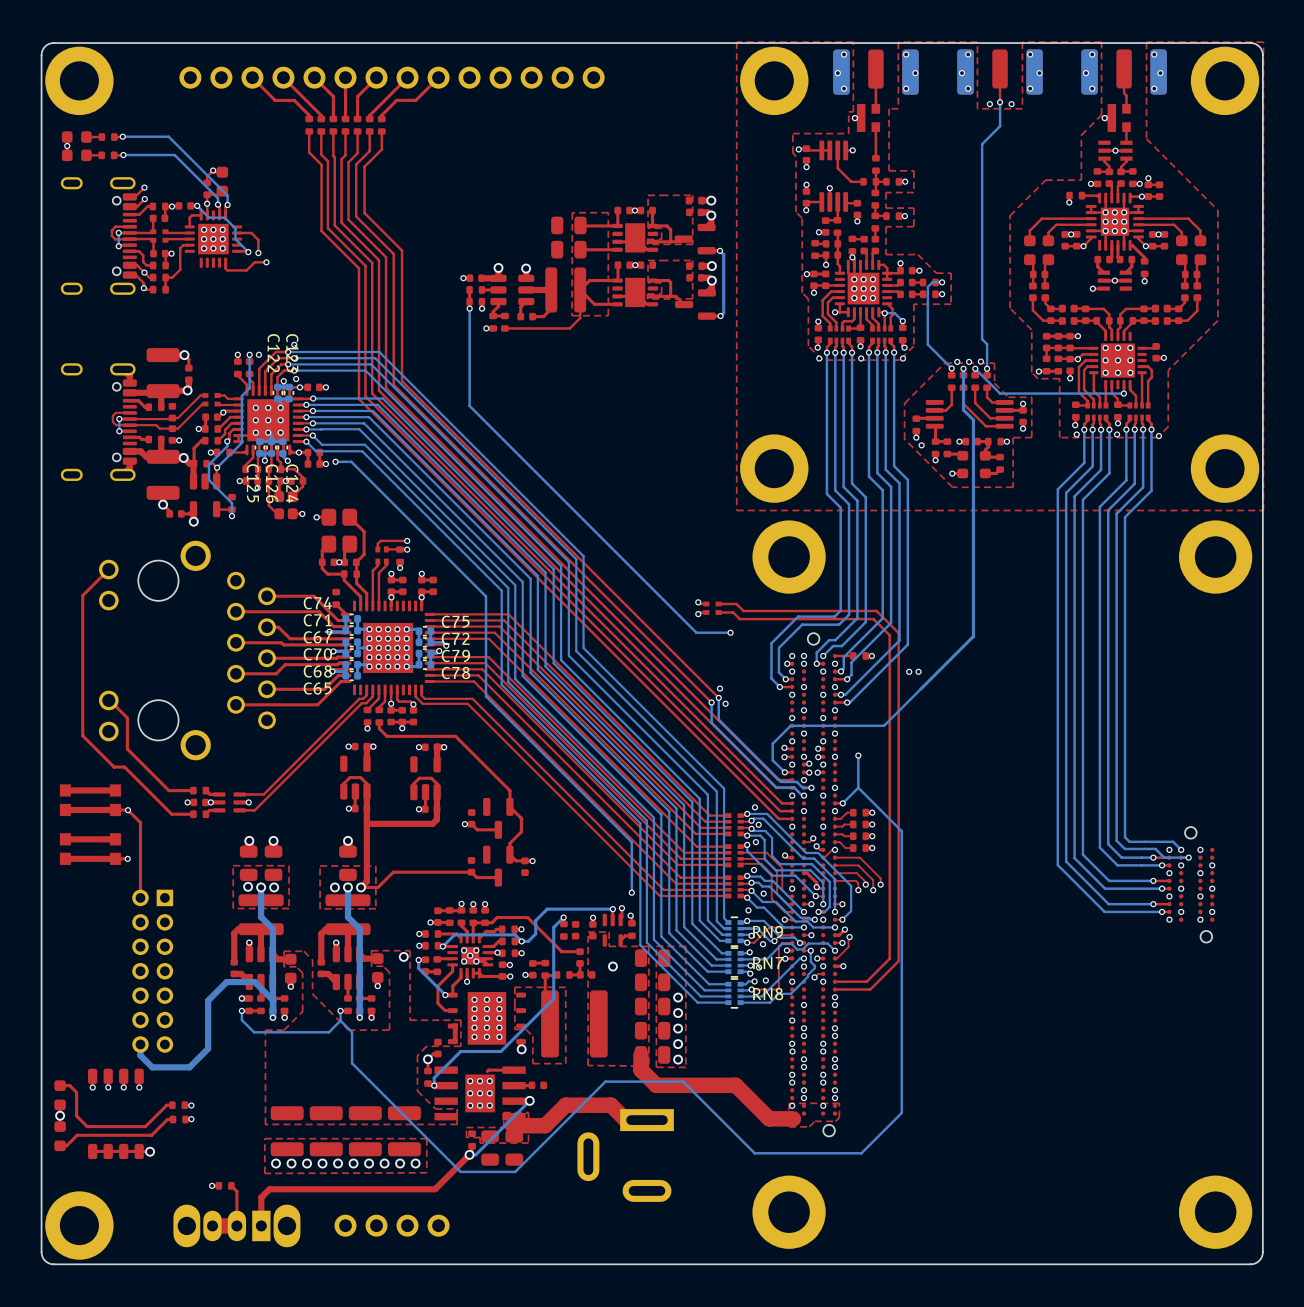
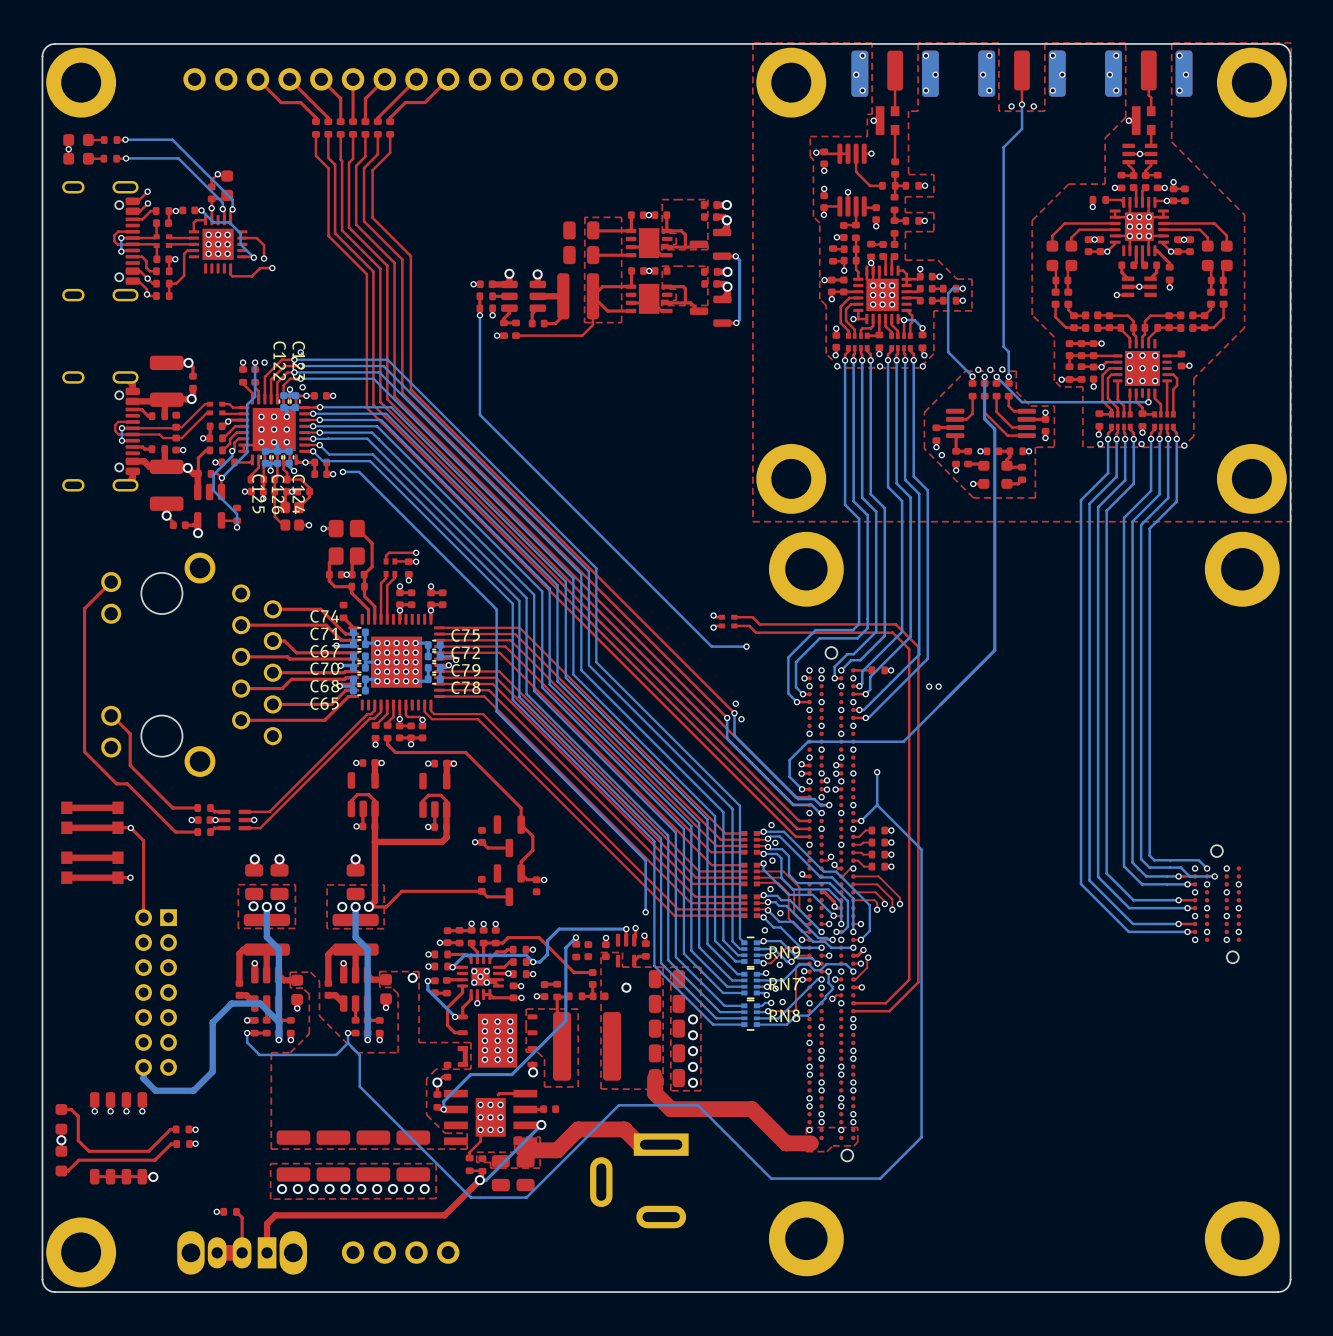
top track: none -> (480, 1129) (480, 1141) (469, 1152) (469, 1158)
part: none -> (469, 1164)
top track: none -> (469, 1170) (482, 1171)

